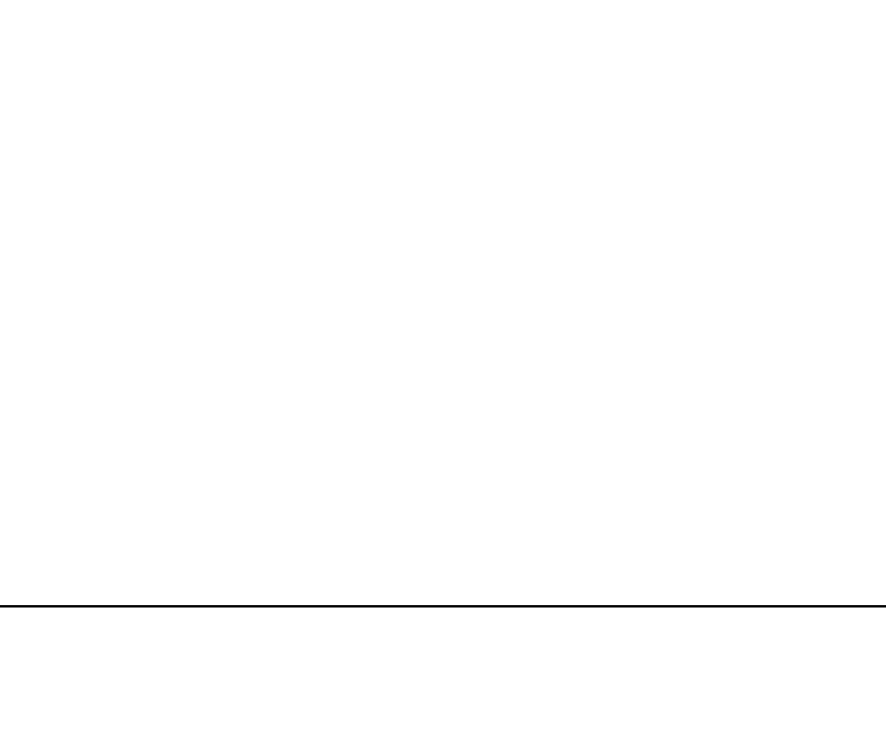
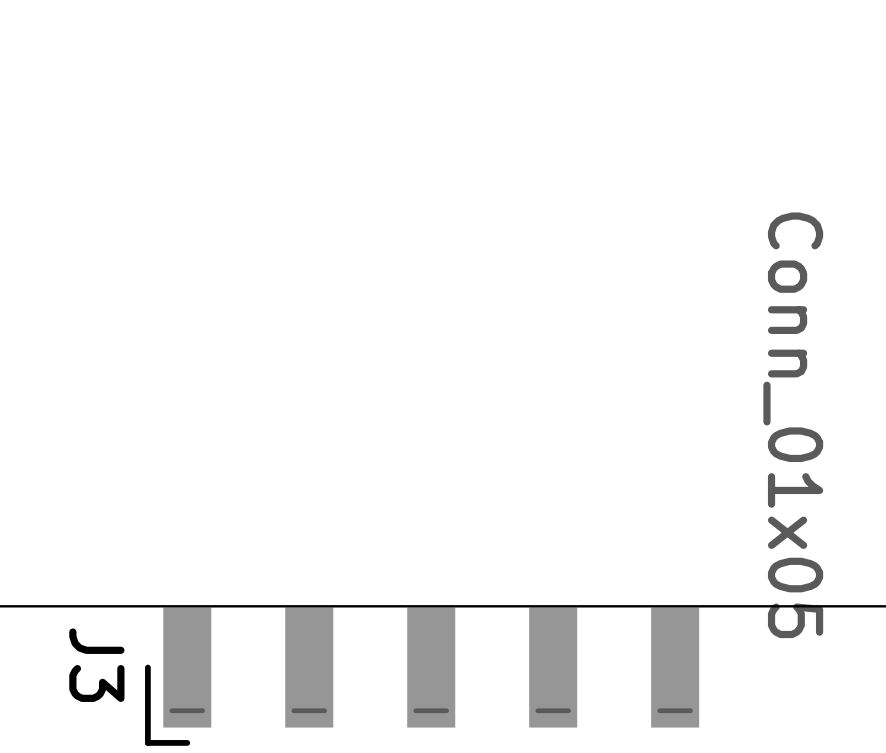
J3: none -> Conn_01x05 (422, 676)

